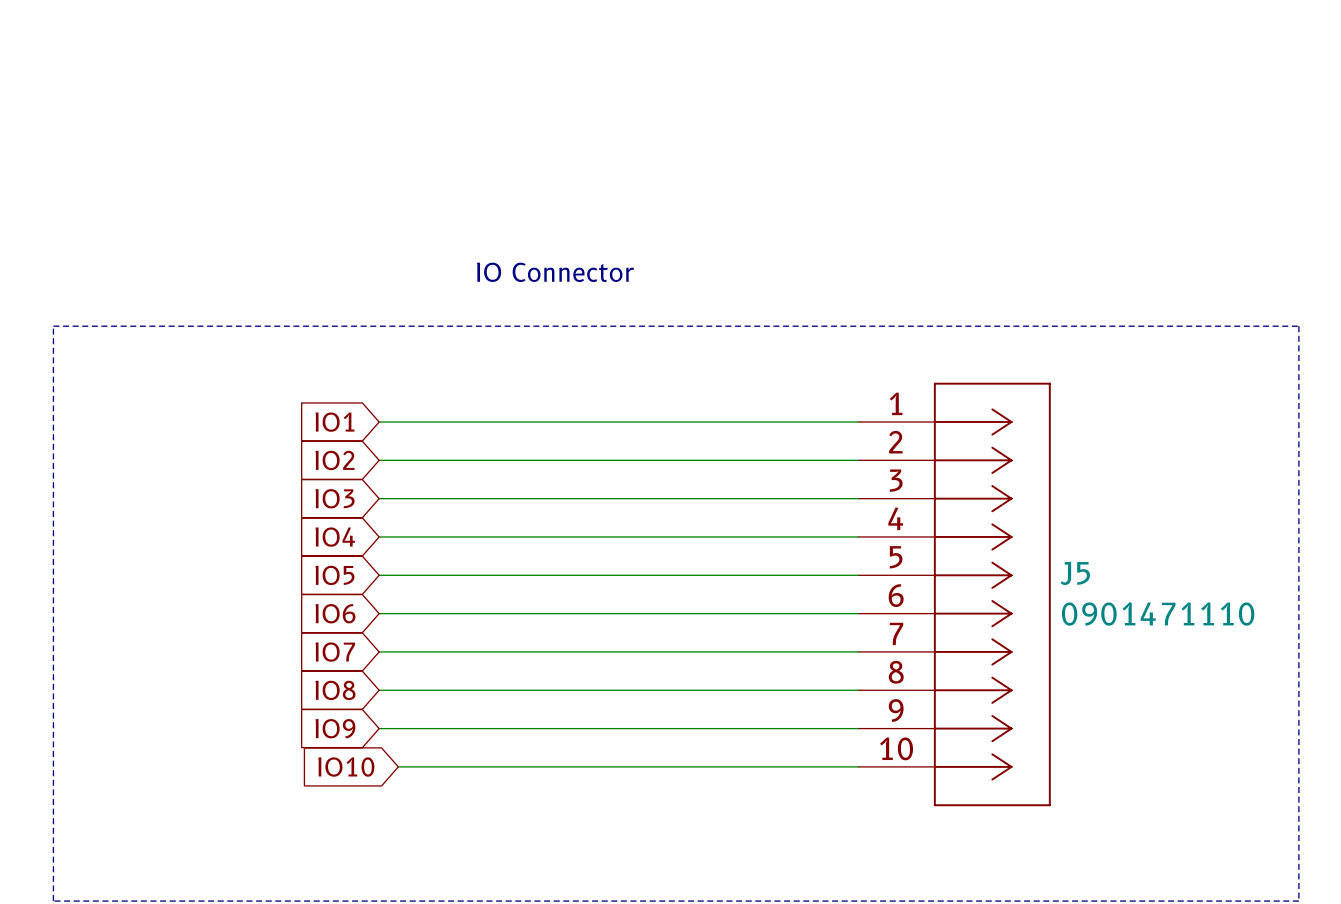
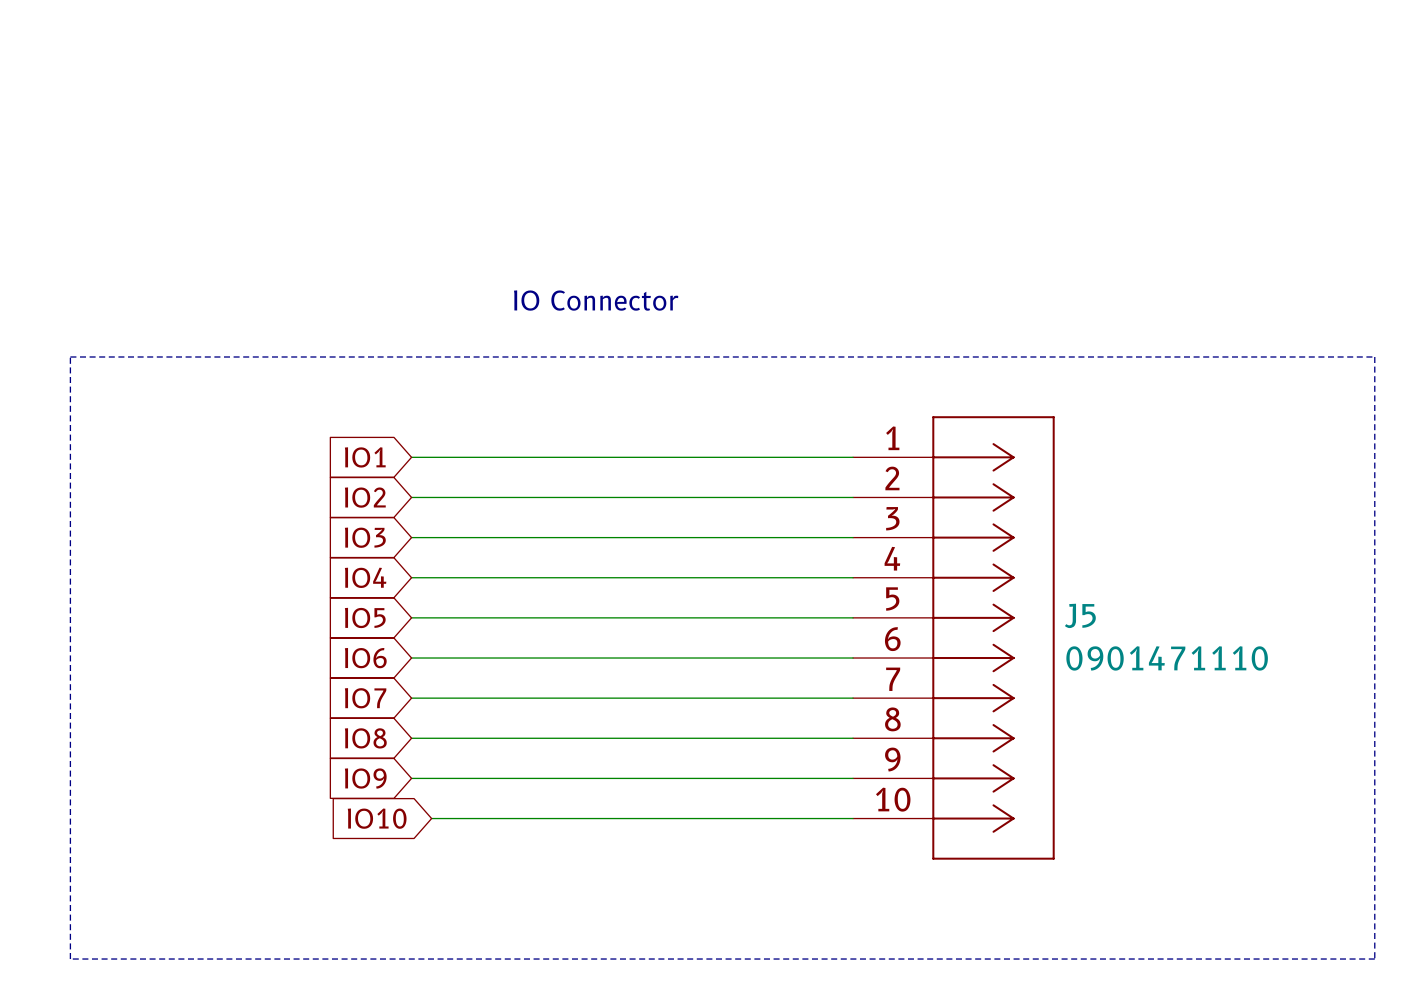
J5 position: (954, 594) -> (953, 637)

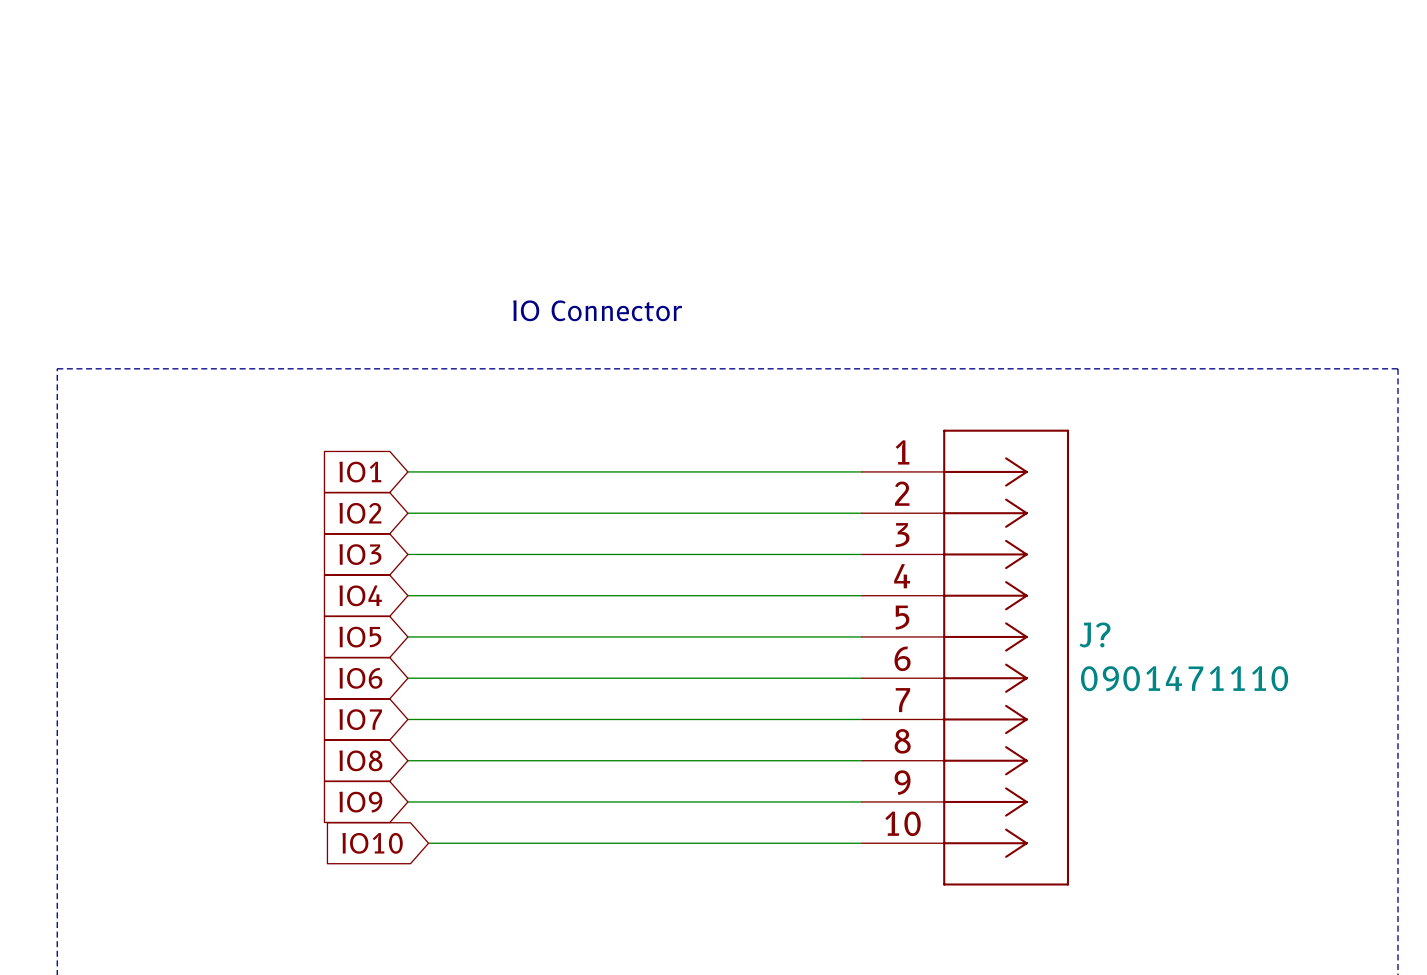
J5 name: J5 (1080, 615) -> J? (1094, 634)

